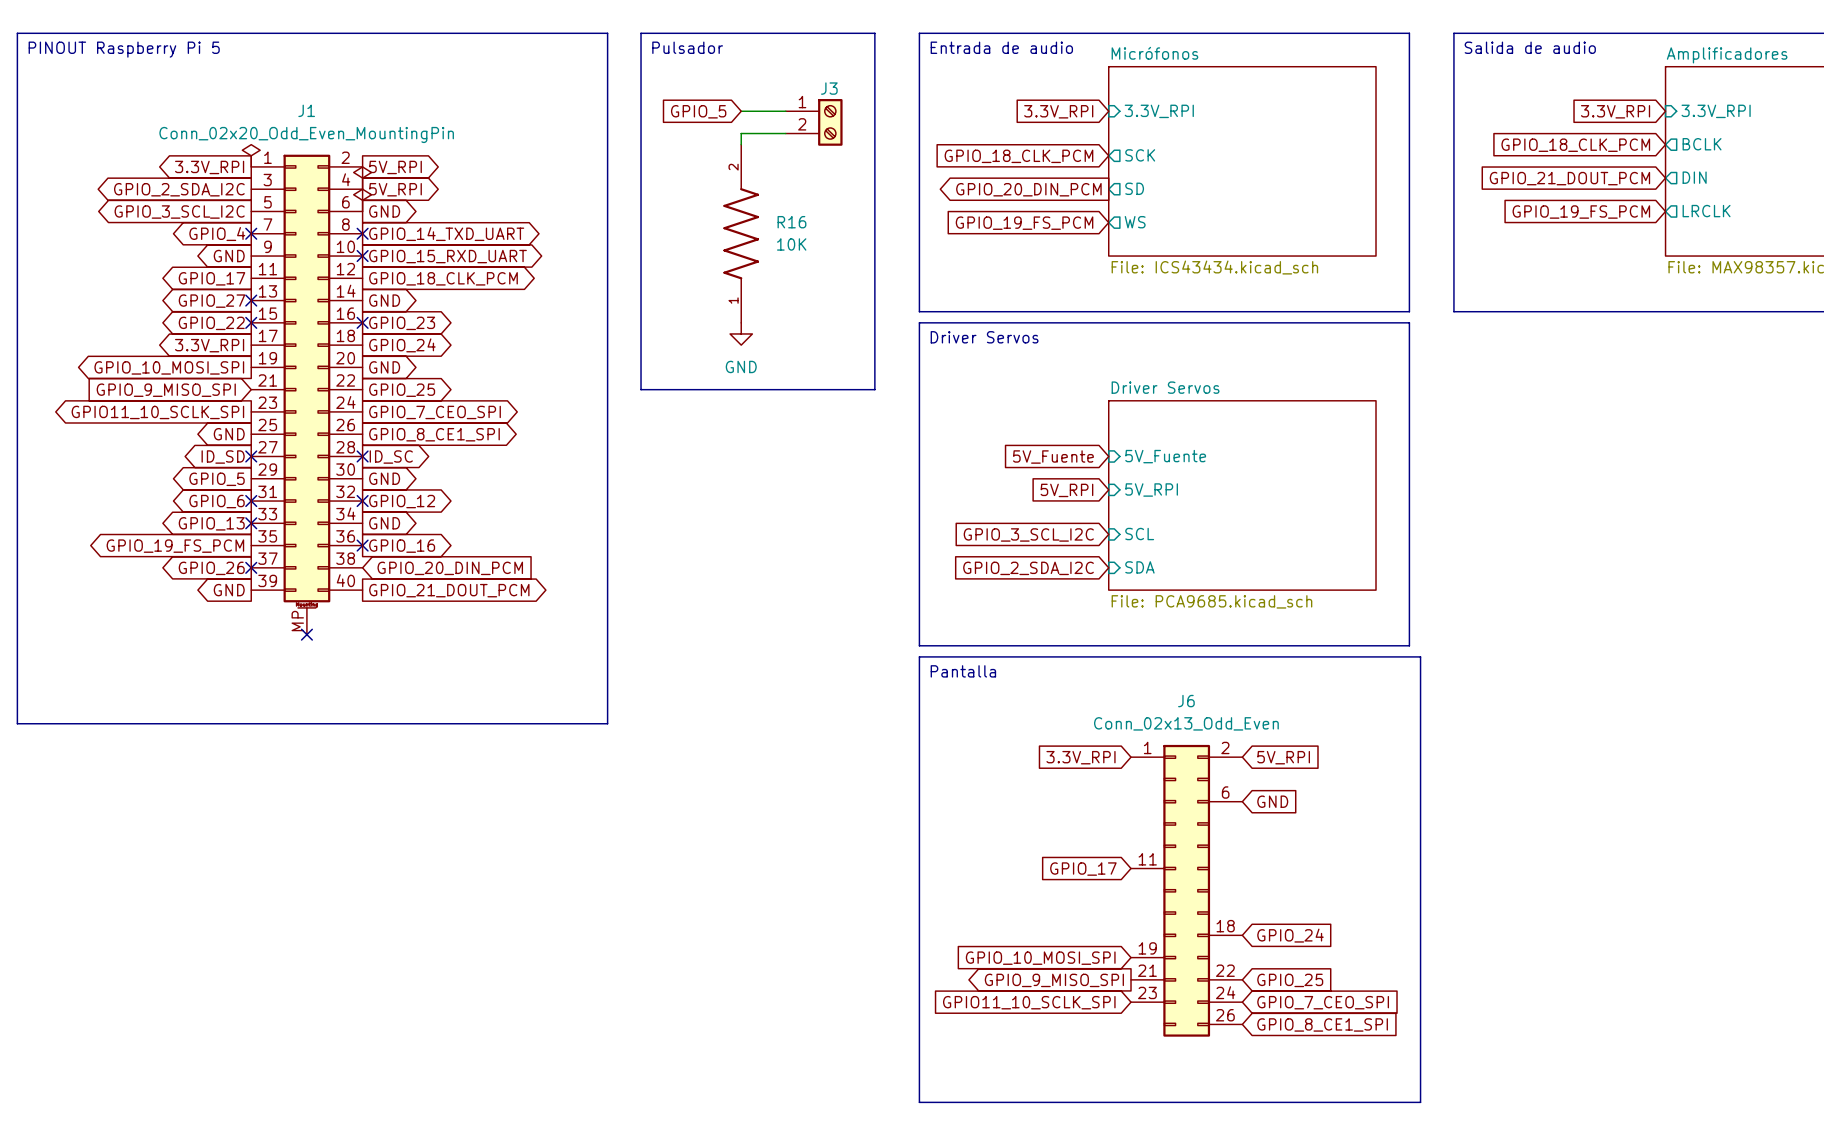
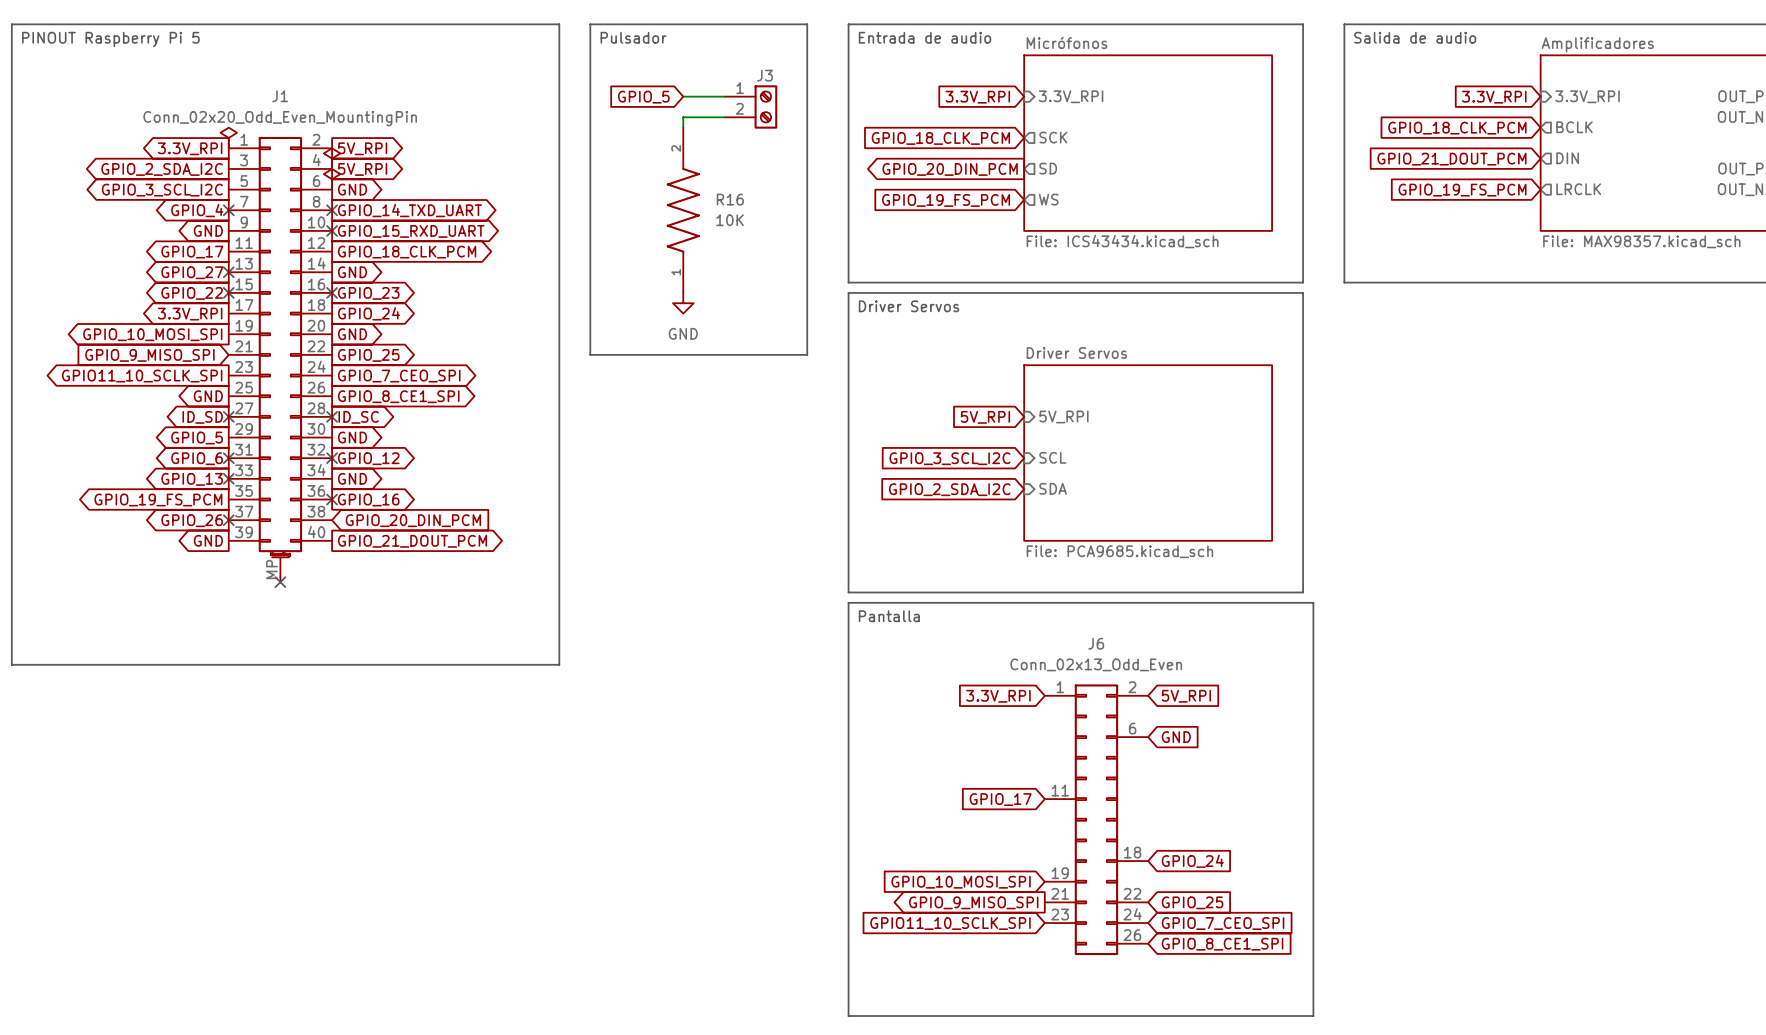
sheet pin: 5V_Fuente (1165, 456) -> 5V_RPI (1063, 416)
global label: 5V_Fuente (1053, 457) -> 5V_RPI (985, 417)
global label: 5V_RPI (1066, 490) -> none
sheet pin: 5V_RPI (1151, 490) -> none
sheet pin: none -> SCL (1052, 457)
global label: none -> GPIO_3_SCL_I2C (949, 458)
global label: GPIO_3_SCL_I2C (1028, 534) -> GPIO_2_SDA_I2C (949, 489)
sheet pin: SCL (1139, 534) -> SDA (1053, 488)
sheet pin: SDA (1139, 567) -> none
global label: GPIO_2_SDA_I2C (1028, 568) -> none

